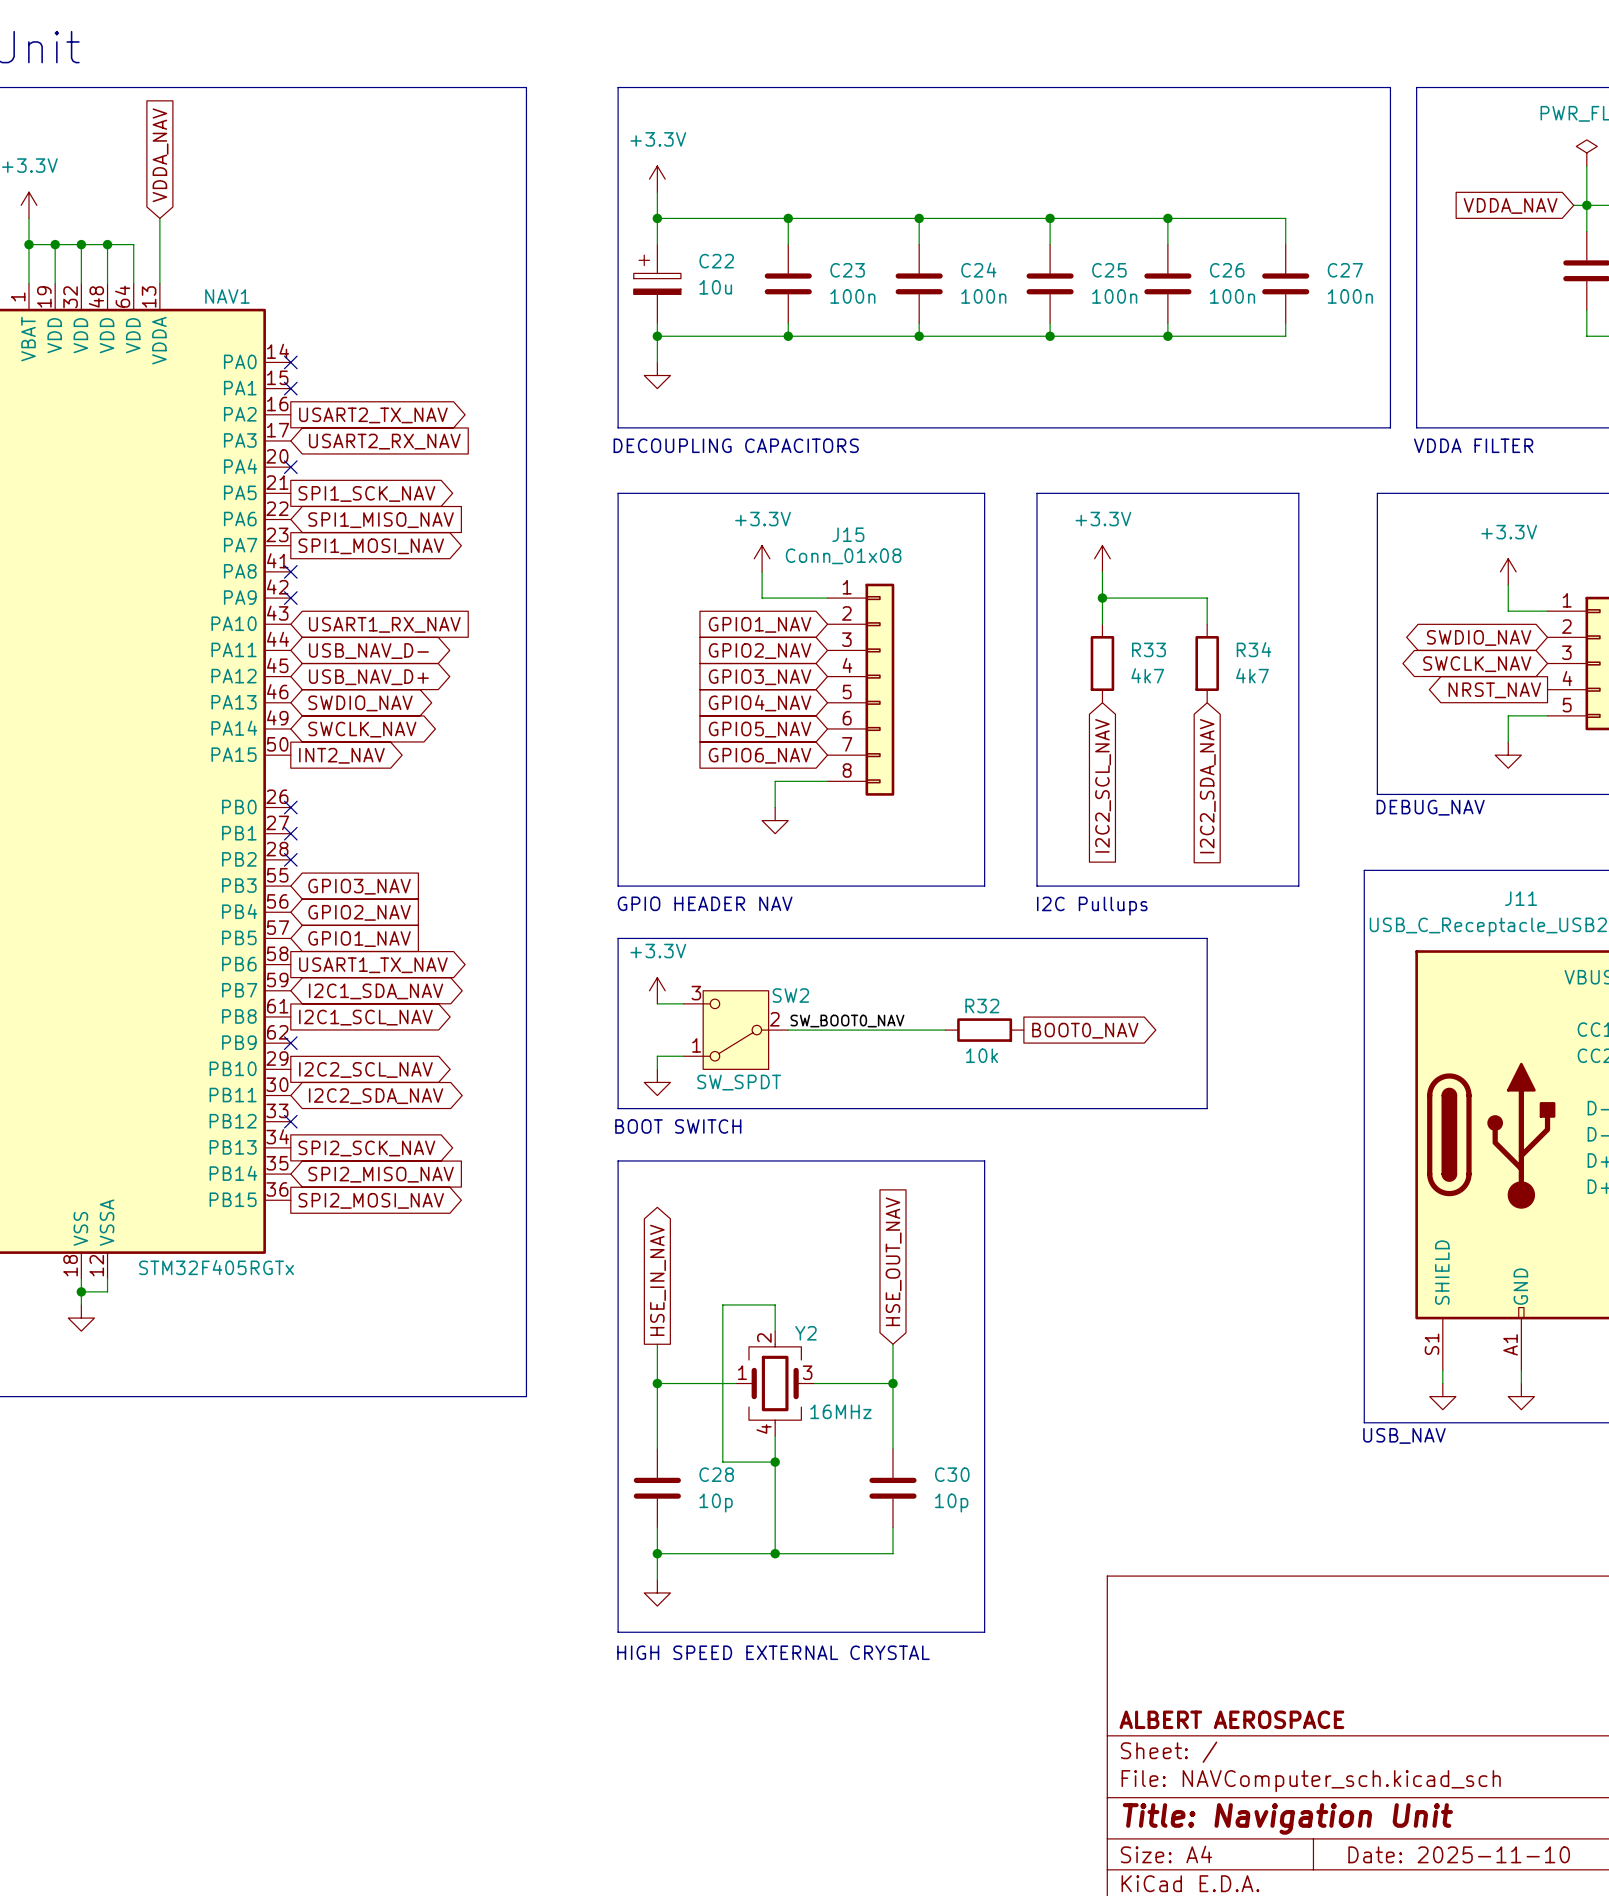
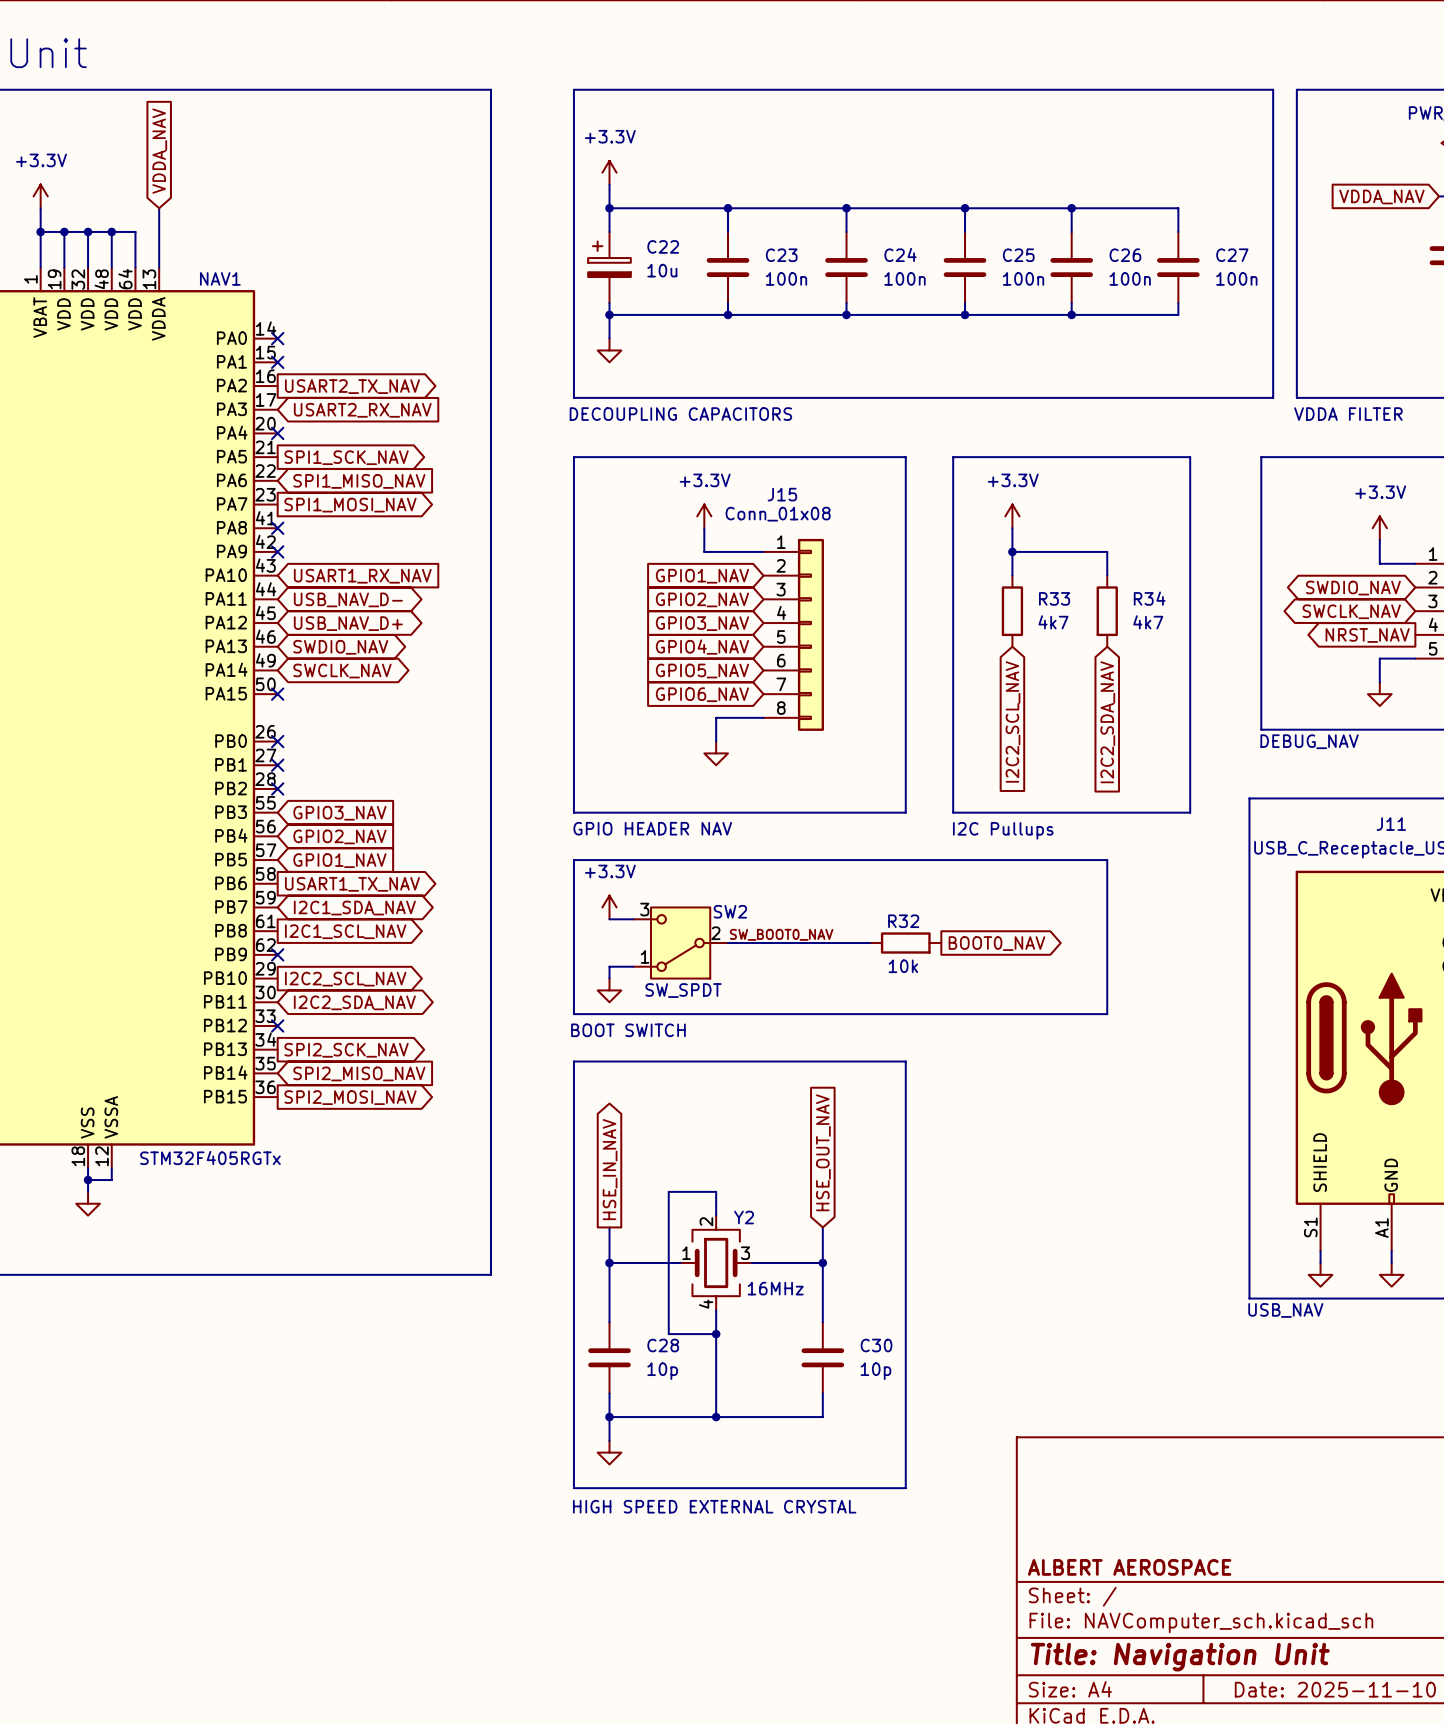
no-connect mark: none -> (277, 694)
global label: INT2_NAV (341, 755) -> none

